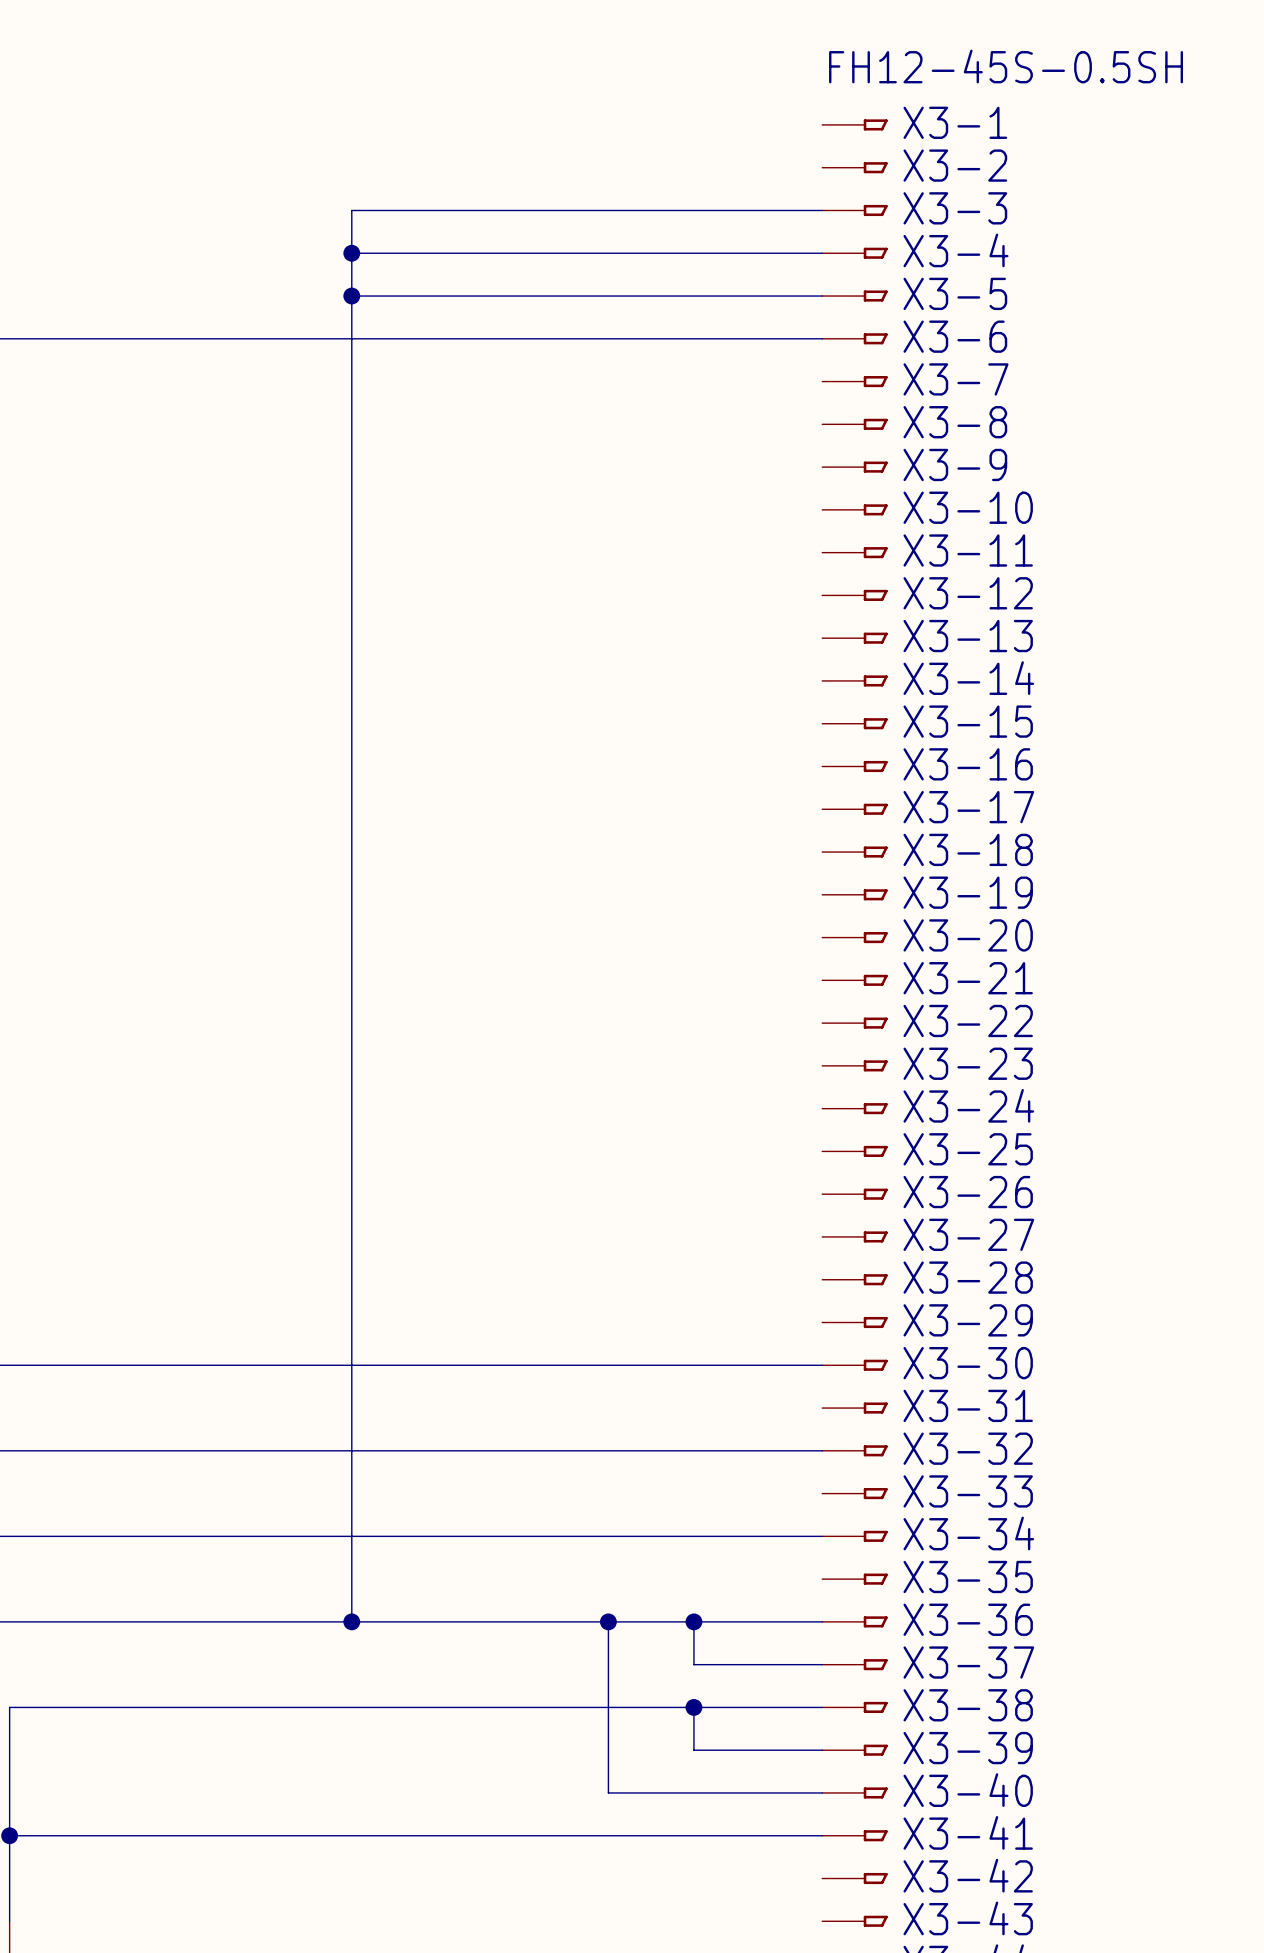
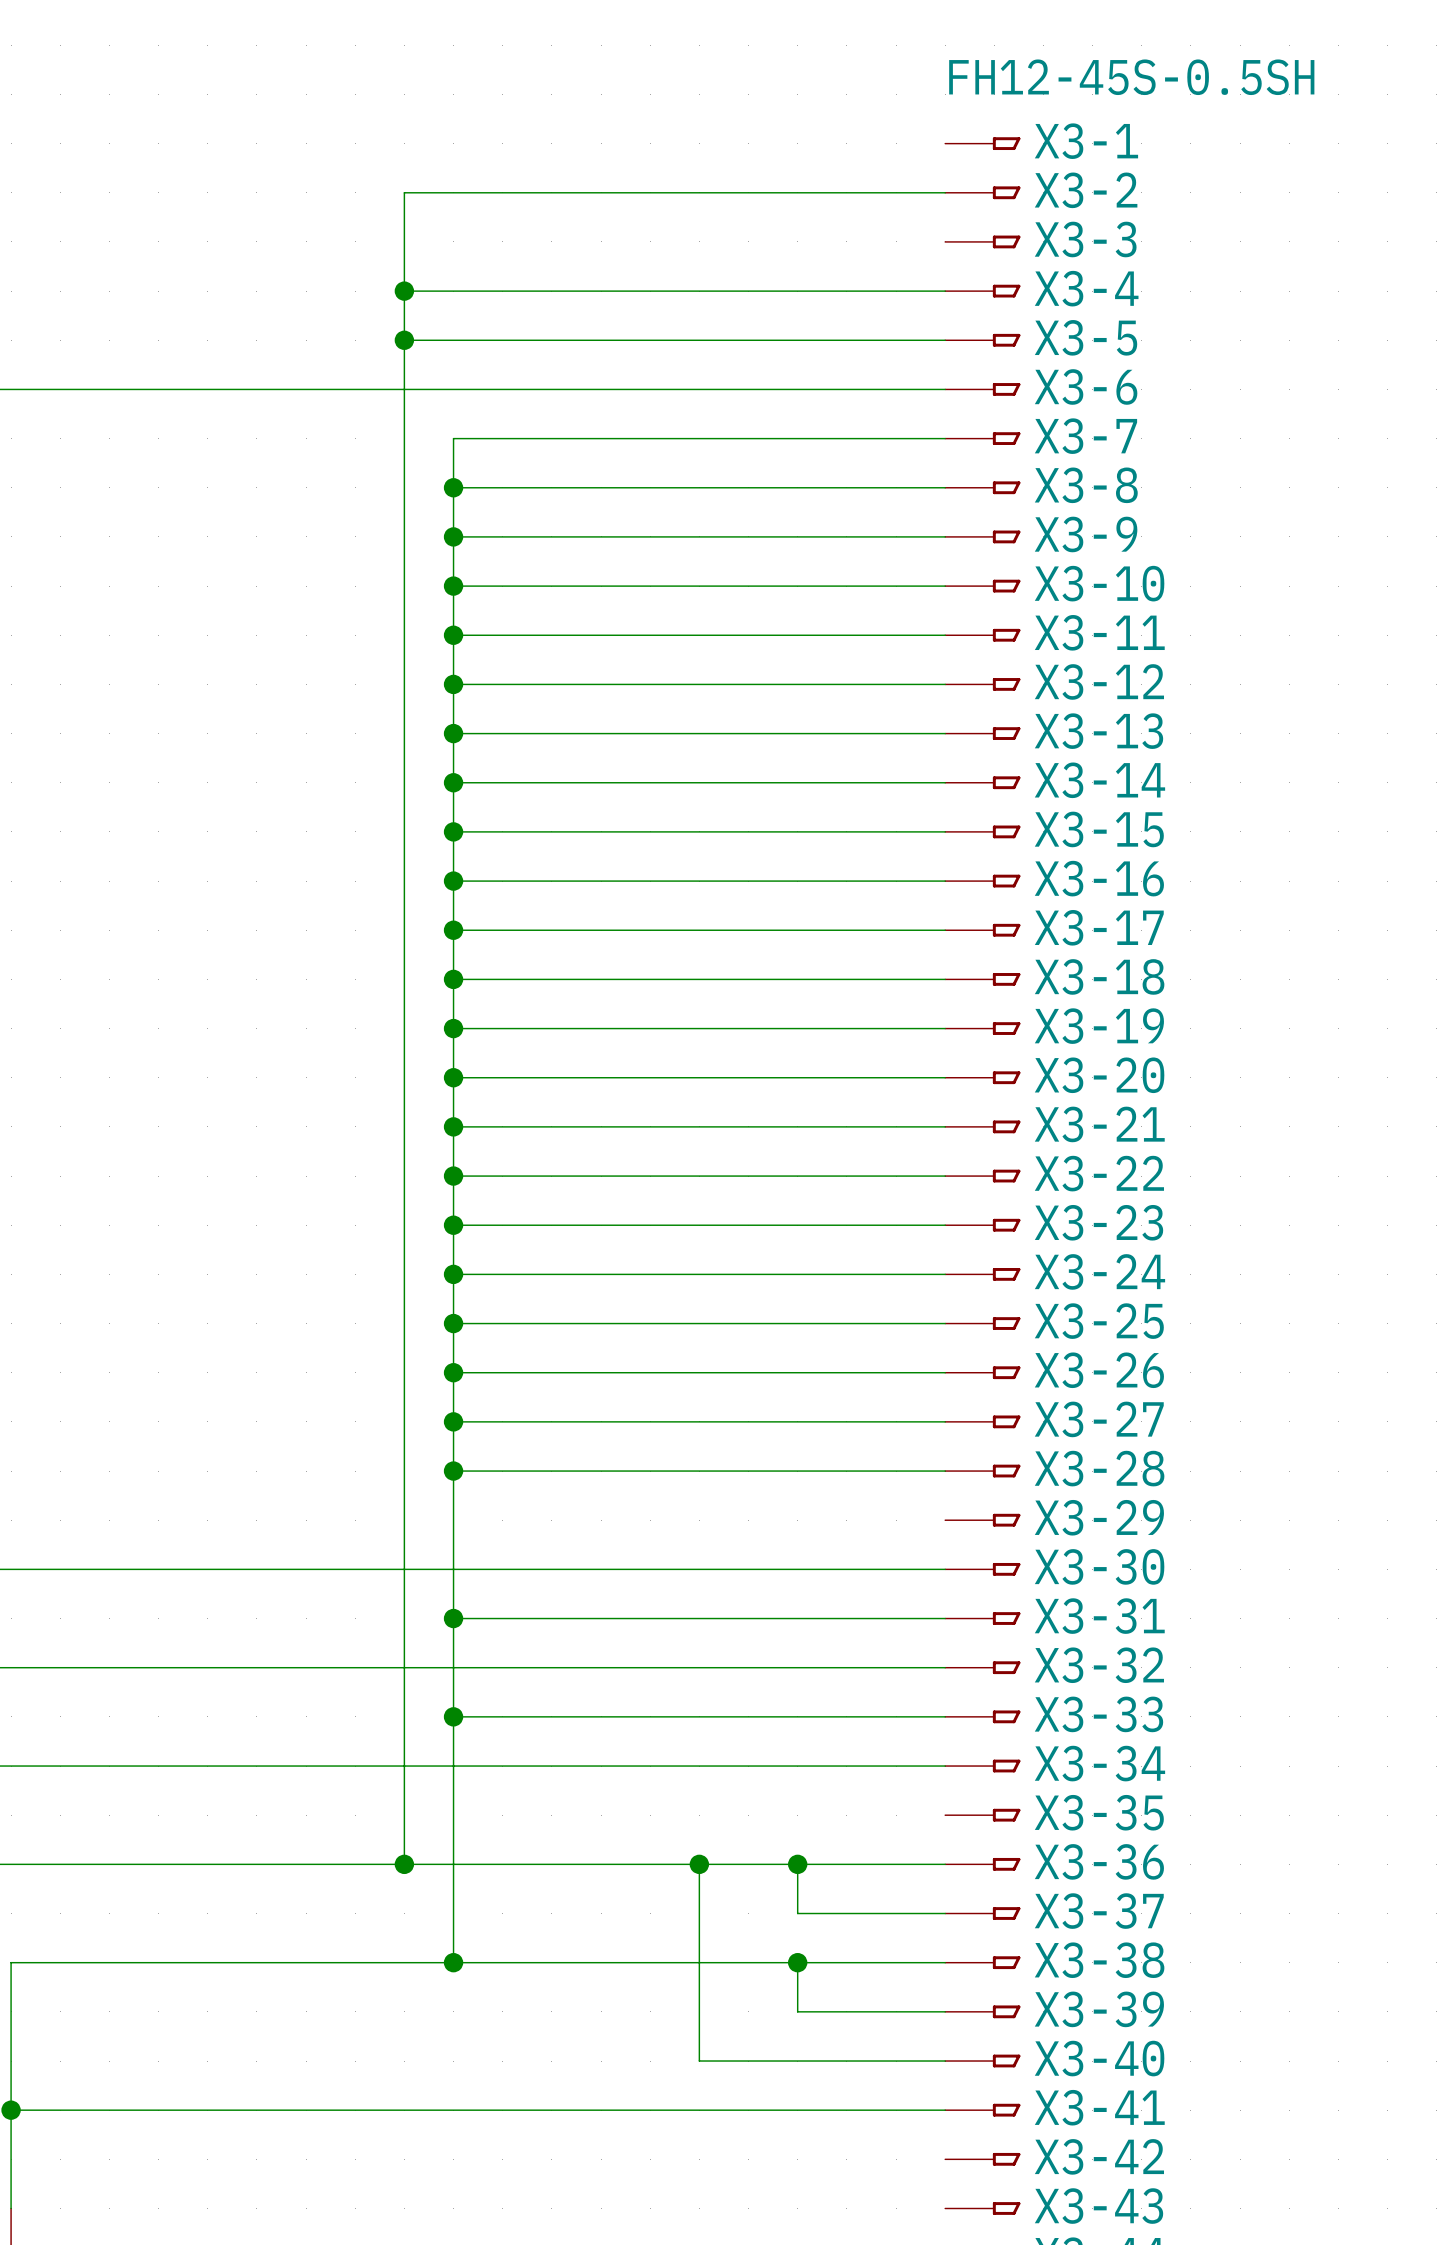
wire: (351, 210) (822, 210) -> (404, 241) (404, 192) (945, 192)
wire: none -> (945, 438) (453, 438) (453, 1962)
wire: none -> (453, 487) (945, 487)
junction: none -> (453, 487)
wire: none -> (453, 536) (945, 536)
junction: none -> (453, 536)
wire: none -> (453, 586) (945, 586)
junction: none -> (453, 586)
wire: none -> (453, 635) (945, 635)
junction: none -> (453, 635)
wire: none -> (453, 684) (945, 684)
junction: none -> (453, 684)
wire: none -> (453, 733) (945, 733)
junction: none -> (453, 733)
wire: none -> (453, 782) (945, 782)
junction: none -> (453, 782)
wire: none -> (453, 831) (945, 831)
junction: none -> (453, 831)
wire: none -> (453, 881) (945, 881)
junction: none -> (453, 881)
wire: none -> (453, 930) (945, 930)
junction: none -> (453, 930)
wire: none -> (453, 979) (945, 979)
junction: none -> (453, 979)
wire: none -> (453, 1028) (945, 1028)
junction: none -> (453, 1028)
wire: none -> (453, 1077) (945, 1077)
junction: none -> (453, 1077)
wire: none -> (453, 1126) (945, 1126)
junction: none -> (453, 1126)
wire: none -> (453, 1176) (945, 1176)
junction: none -> (453, 1176)
wire: none -> (453, 1225) (945, 1225)
junction: none -> (453, 1225)
wire: none -> (453, 1274) (945, 1274)
junction: none -> (453, 1274)
wire: none -> (453, 1323) (945, 1323)
junction: none -> (453, 1323)
wire: none -> (453, 1372) (945, 1372)
junction: none -> (453, 1372)
wire: none -> (453, 1421) (945, 1421)
junction: none -> (453, 1421)
wire: none -> (453, 1471) (945, 1471)
junction: none -> (453, 1471)
wire: none -> (453, 1618) (945, 1618)
junction: none -> (453, 1618)
wire: none -> (453, 1716) (945, 1716)
junction: none -> (453, 1716)
junction: none -> (453, 1962)

